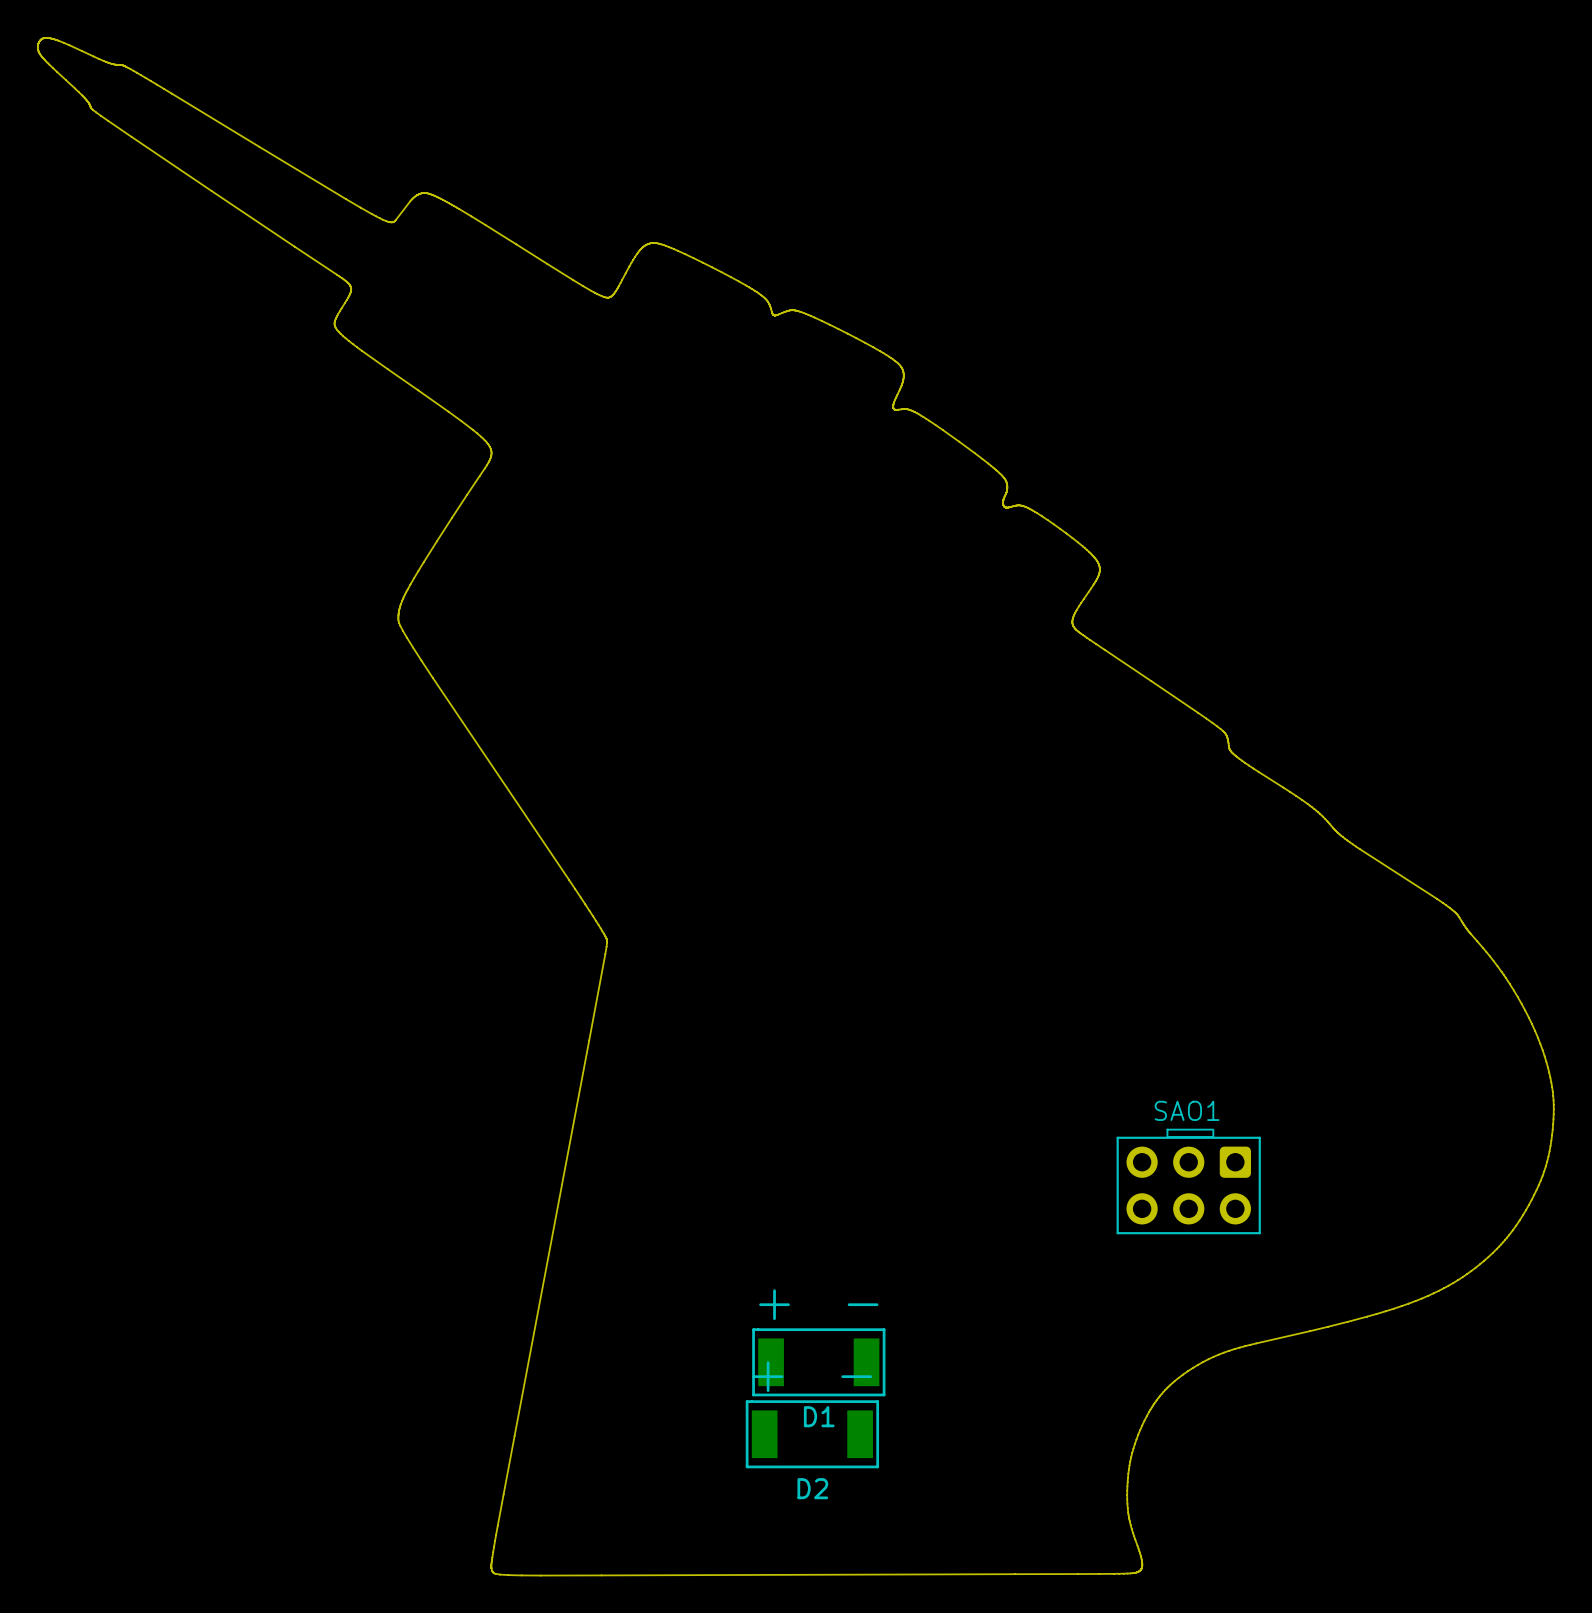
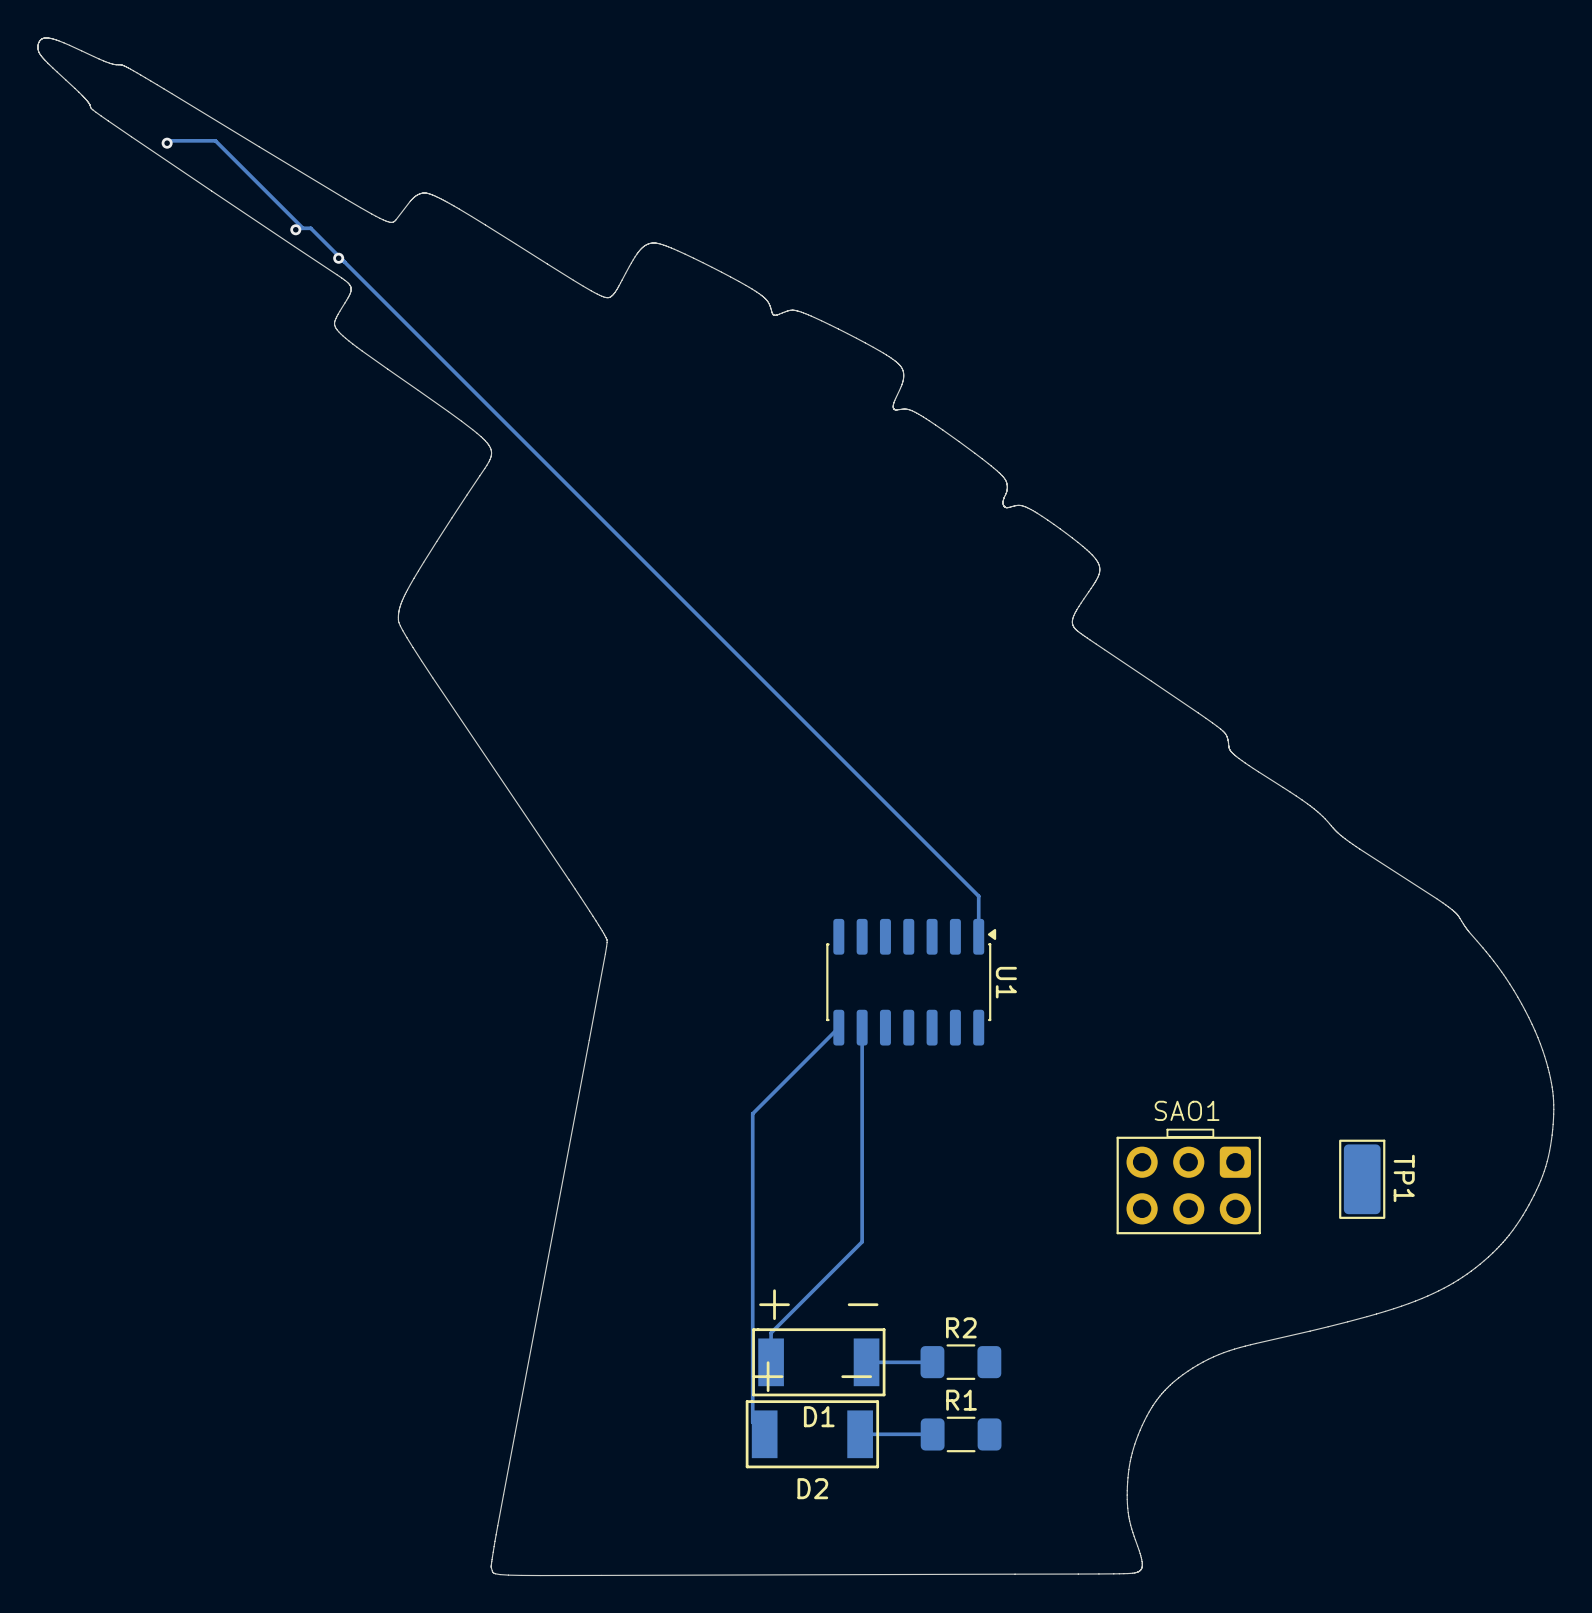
track: none -> (167, 143) (169, 140) (215, 140) (302, 228)
via: none -> (167, 143)
track: none -> (295, 229) (310, 228) (978, 896) (978, 936)
via: none -> (295, 229)
via: none -> (338, 258)
U1: none -> (911, 982)
track: none -> (838, 1027) (752, 1113) (752, 1422) (764, 1434)
track: none -> (862, 1027) (862, 1241) (771, 1332) (771, 1362)
TP1: none -> (1362, 1179)
track: none -> (932, 1362) (866, 1362)
R2: none -> (960, 1362)
track: none -> (932, 1434) (860, 1434)
R1: none -> (961, 1434)

